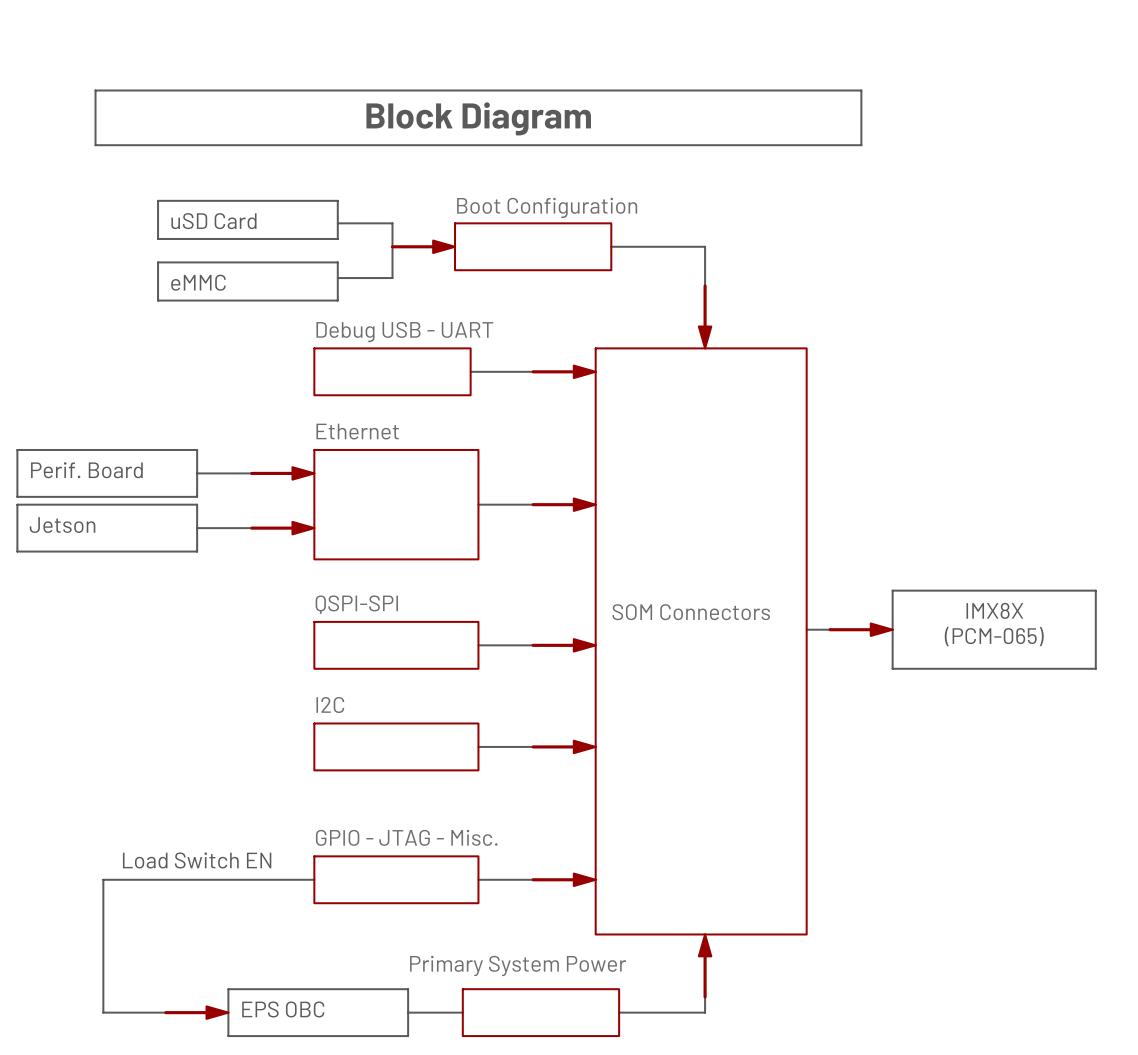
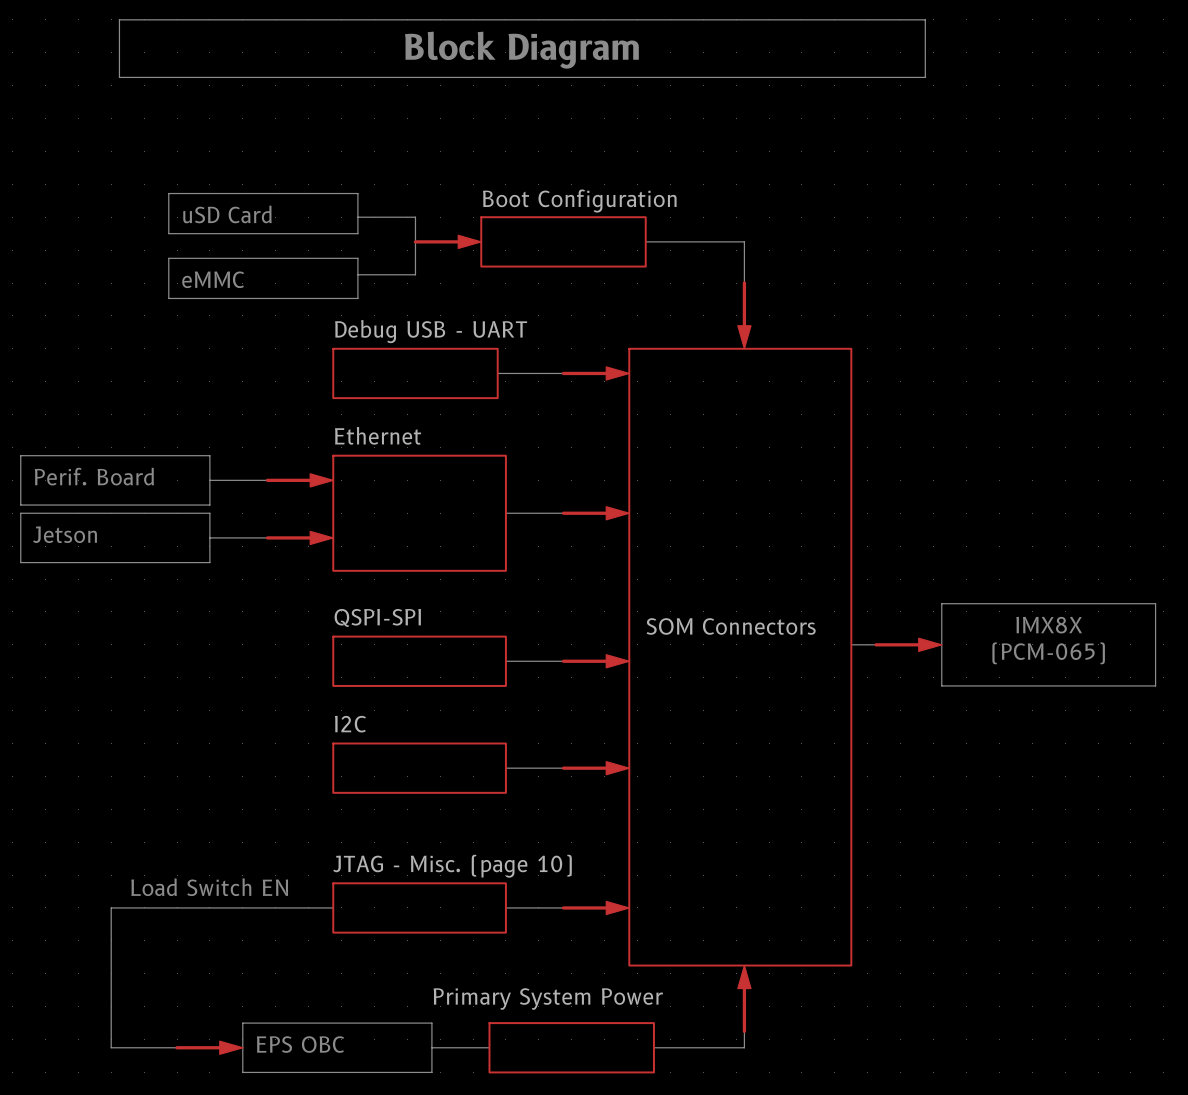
line: (111, 90) (95, 90) (95, 145) (861, 145) (861, 90) -> (119, 77) (119, 19) (925, 19) (925, 77) (908, 77)
text position: Block Diagram (478, 118) -> Block Diagram (521, 50)
sheet GPIO - JTAG - Misc. name: GPIO - JTAG - Misc. (406, 837) -> JTAG - Misc. (page 10) (452, 866)

